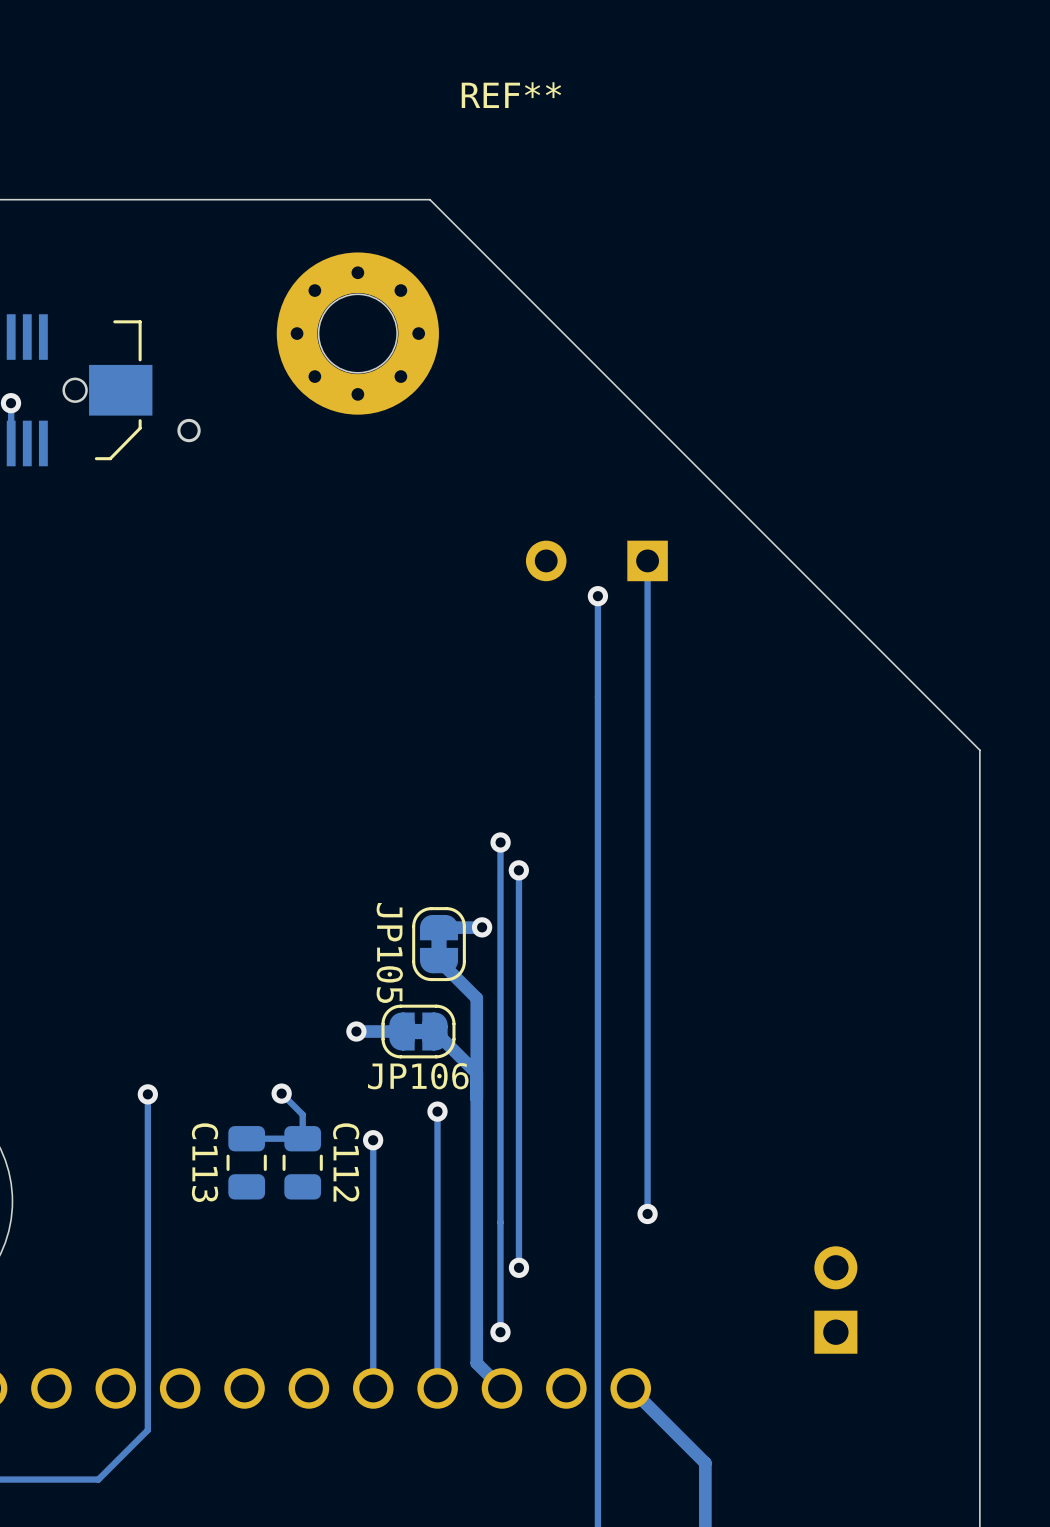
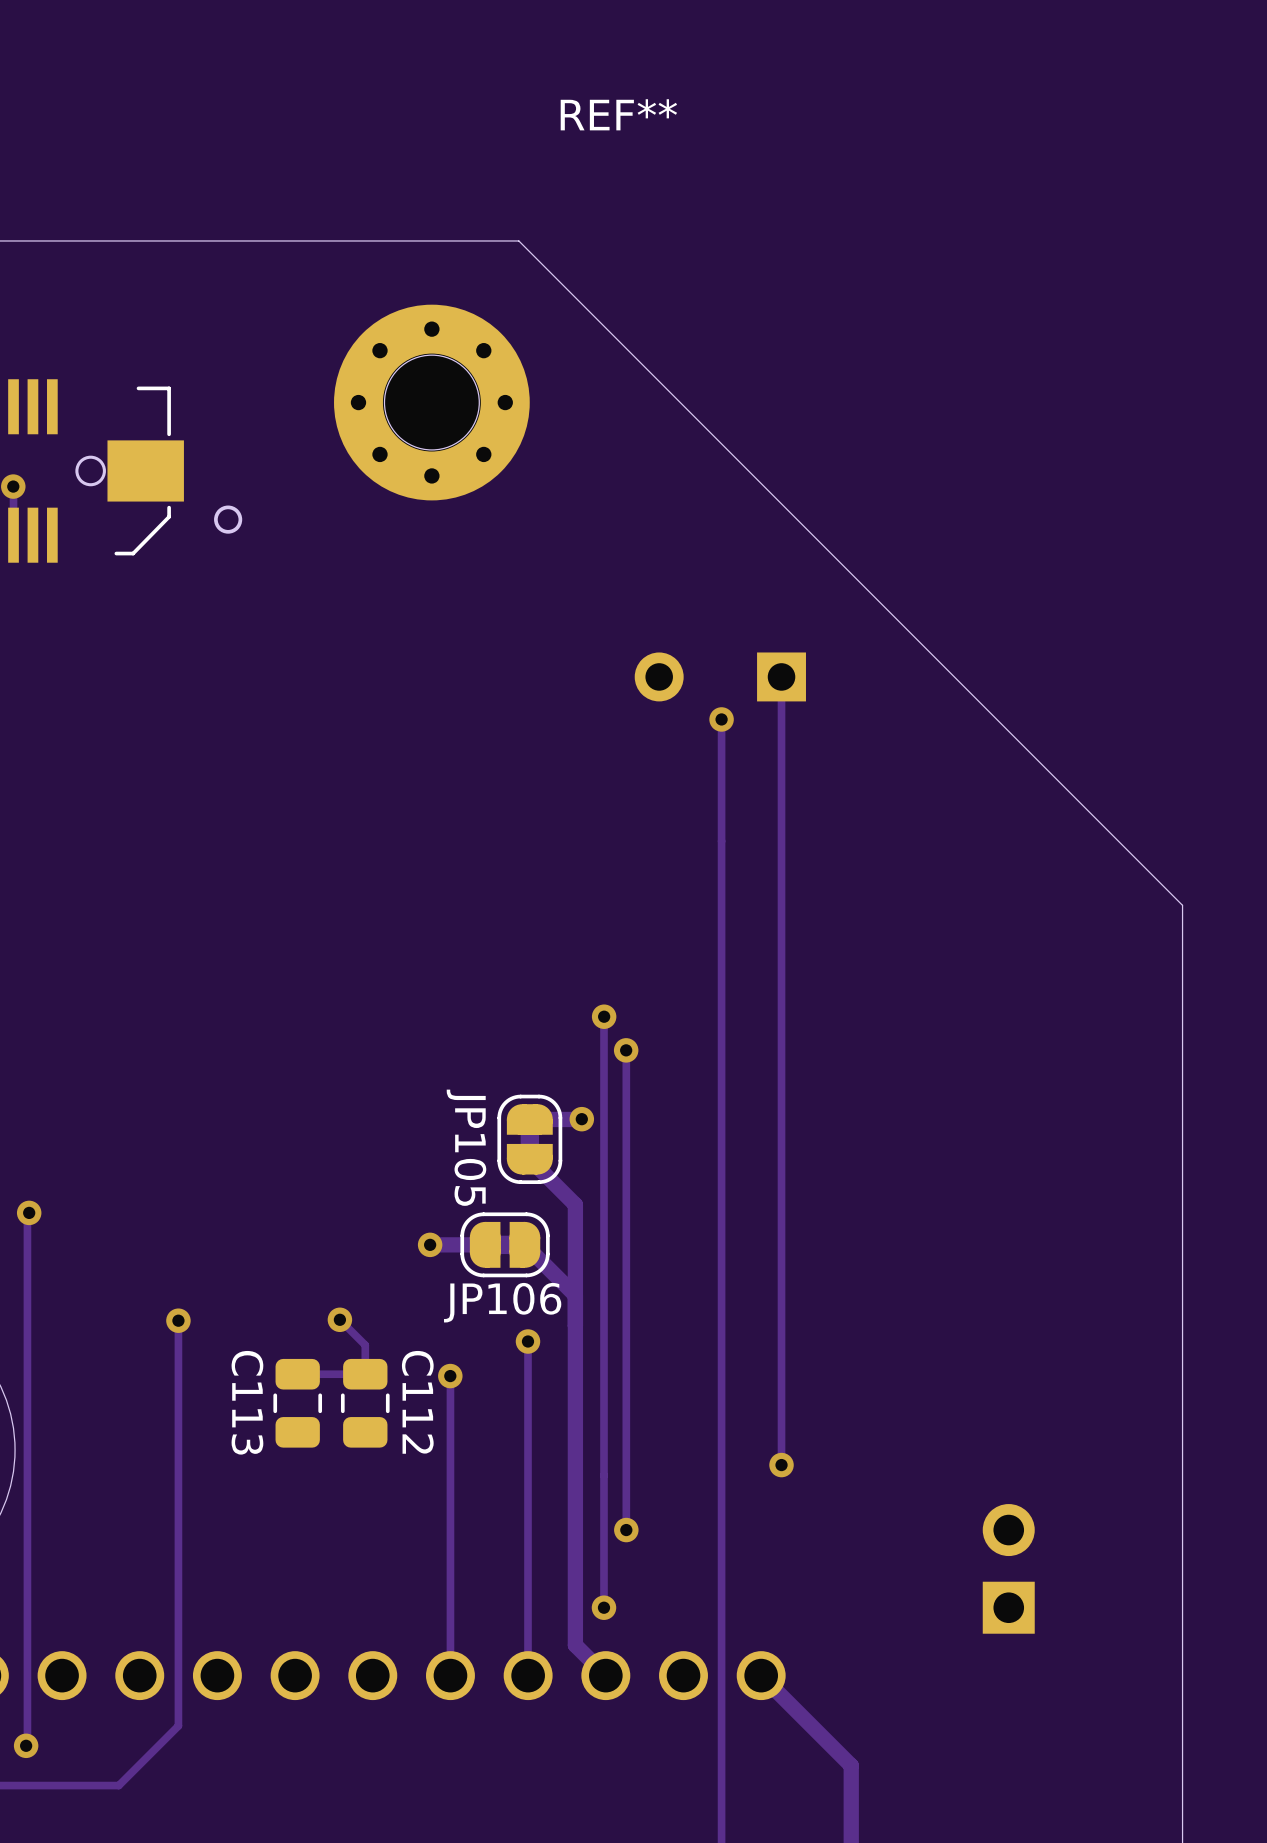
track: none -> (29, 1212) (27, 1214) (26, 1745)
via: none -> (29, 1212)
via: none -> (26, 1745)

